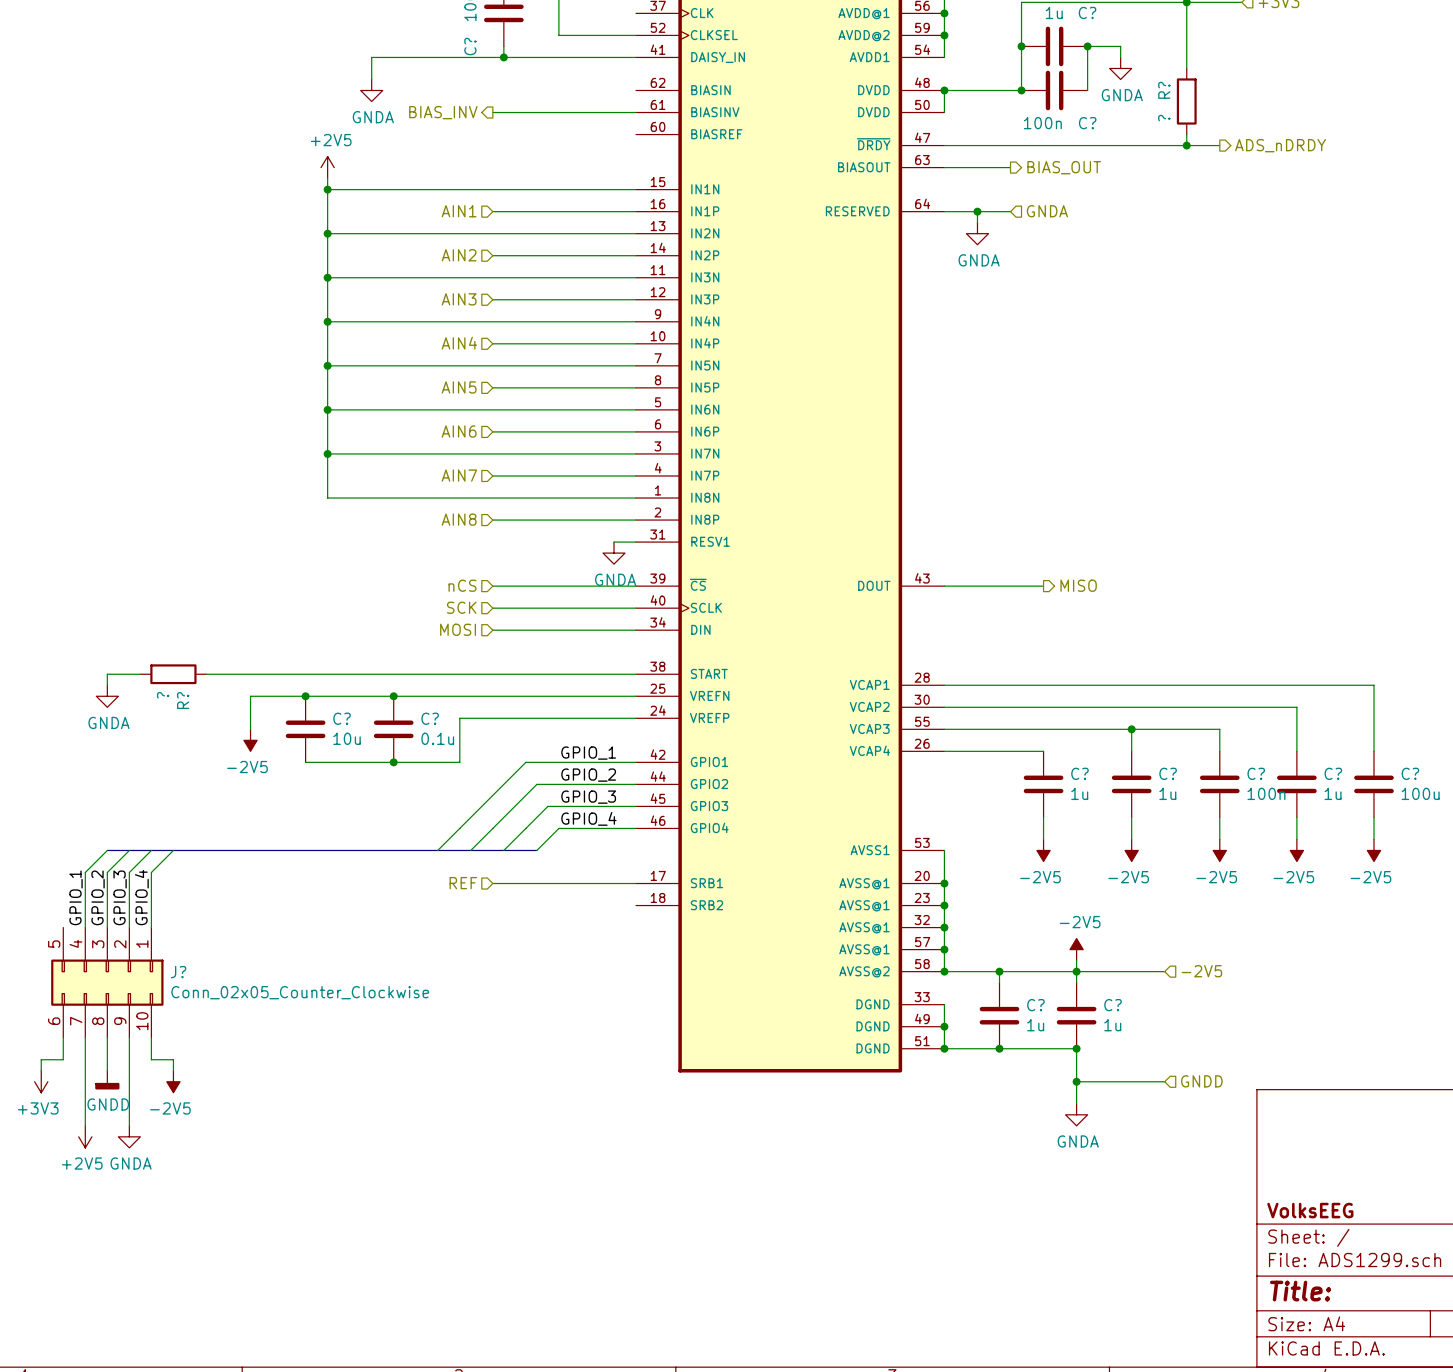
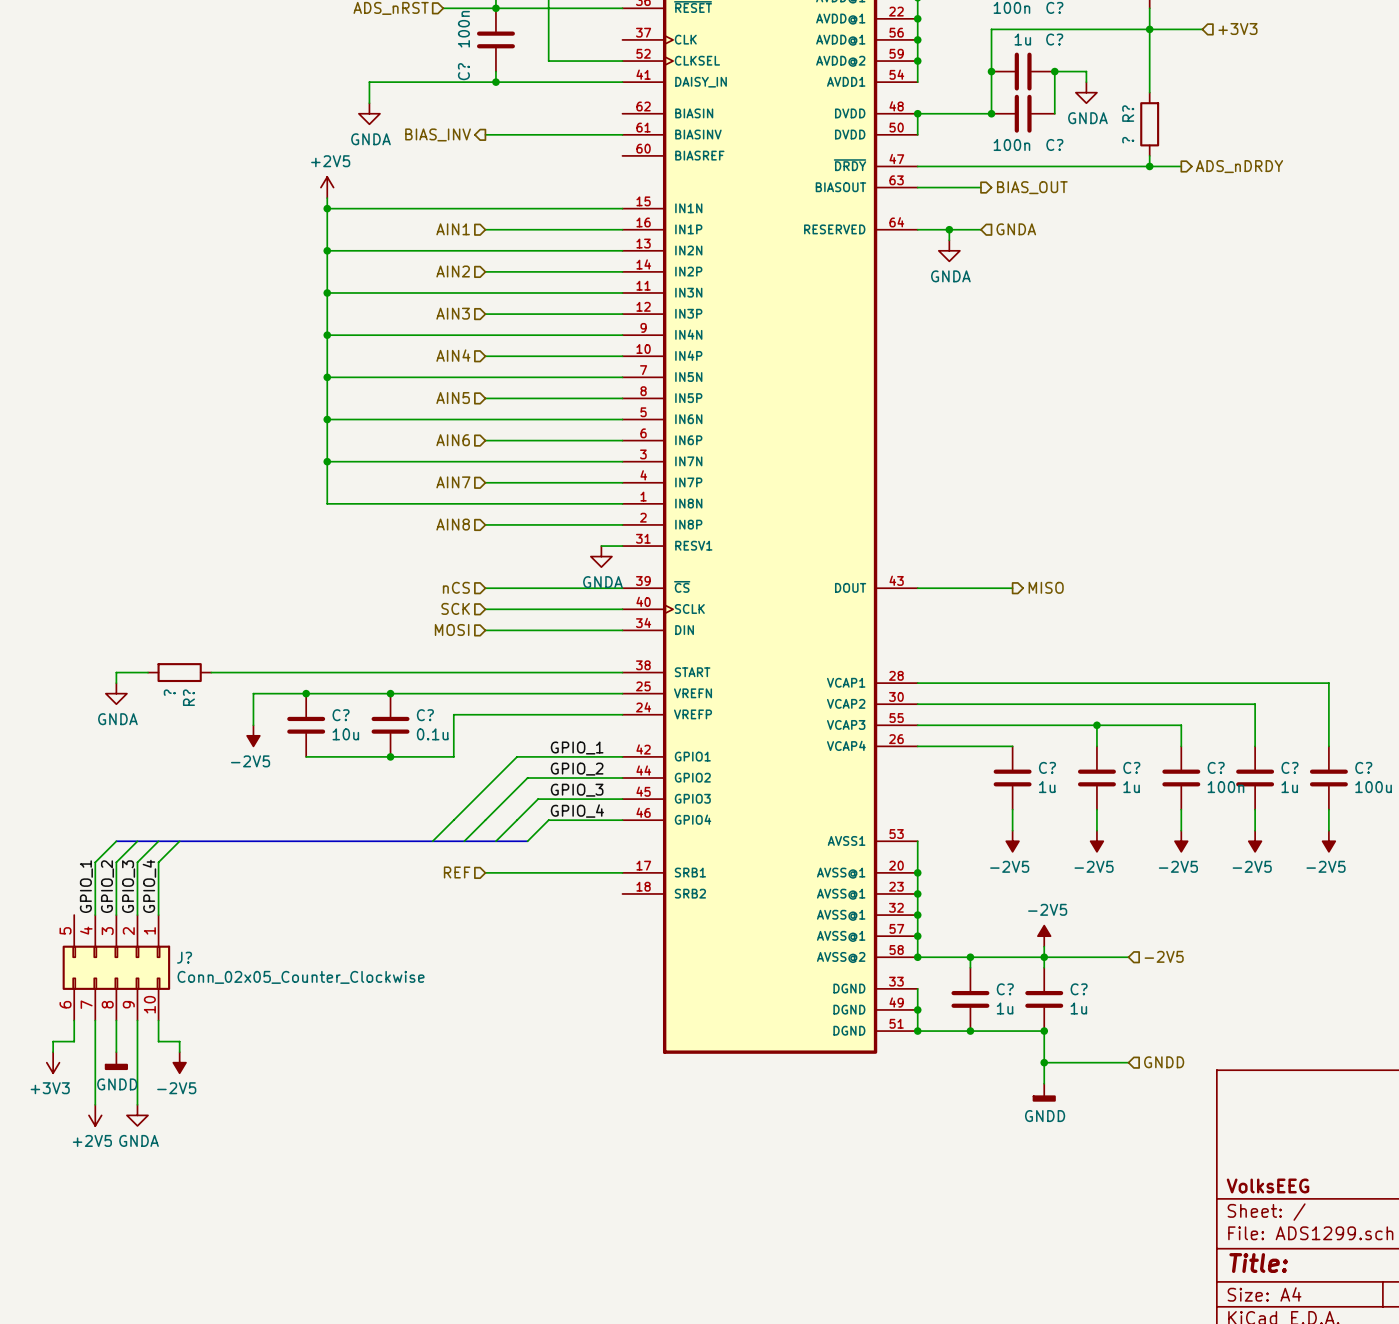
power symbol: GNDA (1076, 1114) -> GNDD (1044, 1092)

